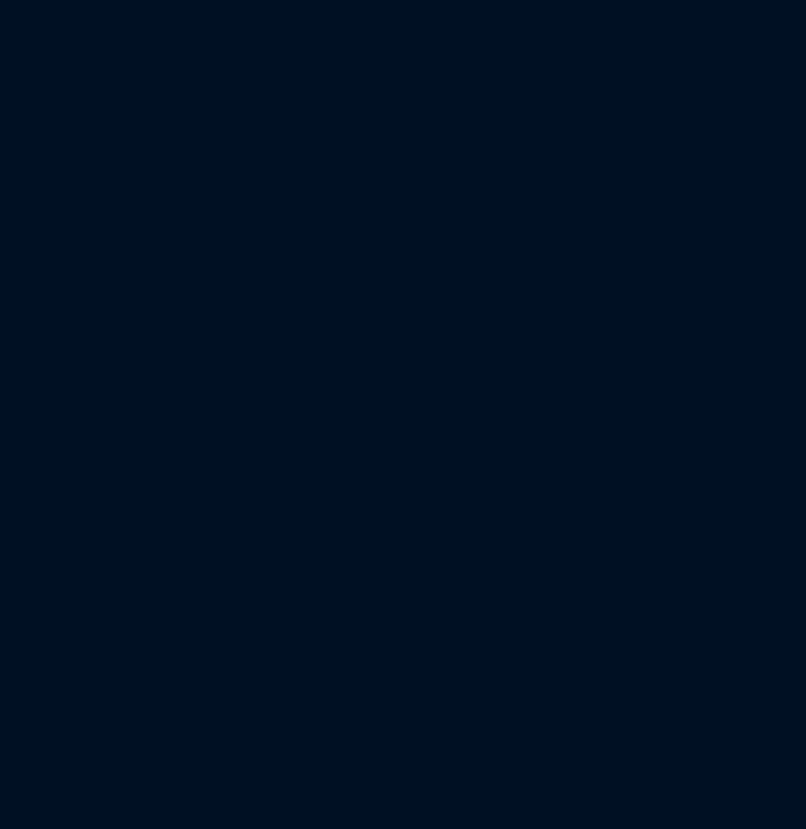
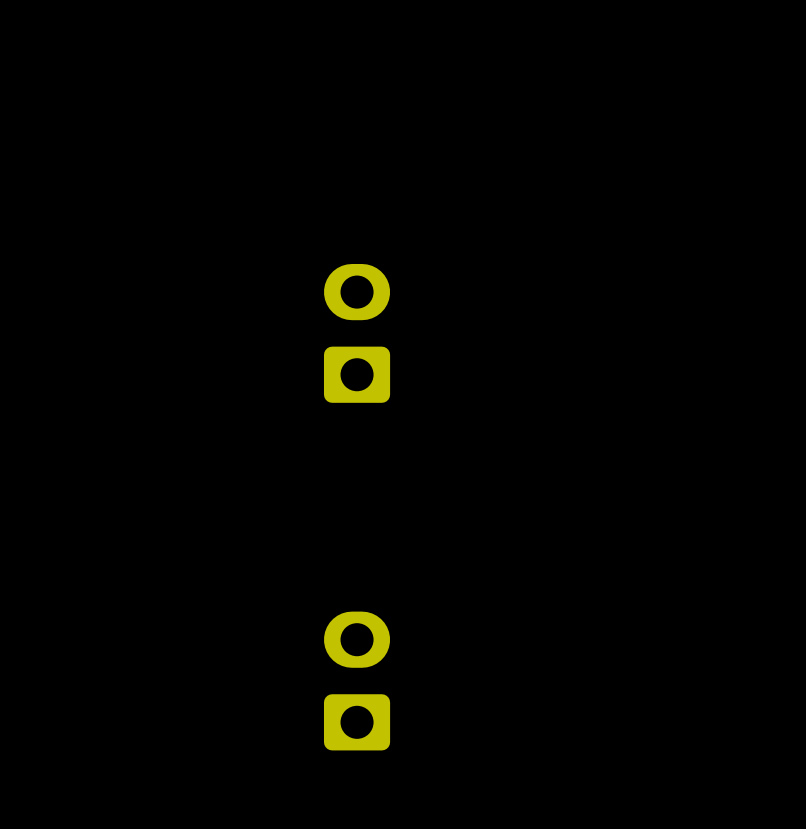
part: none -> (357, 333)
part: none -> (357, 681)

